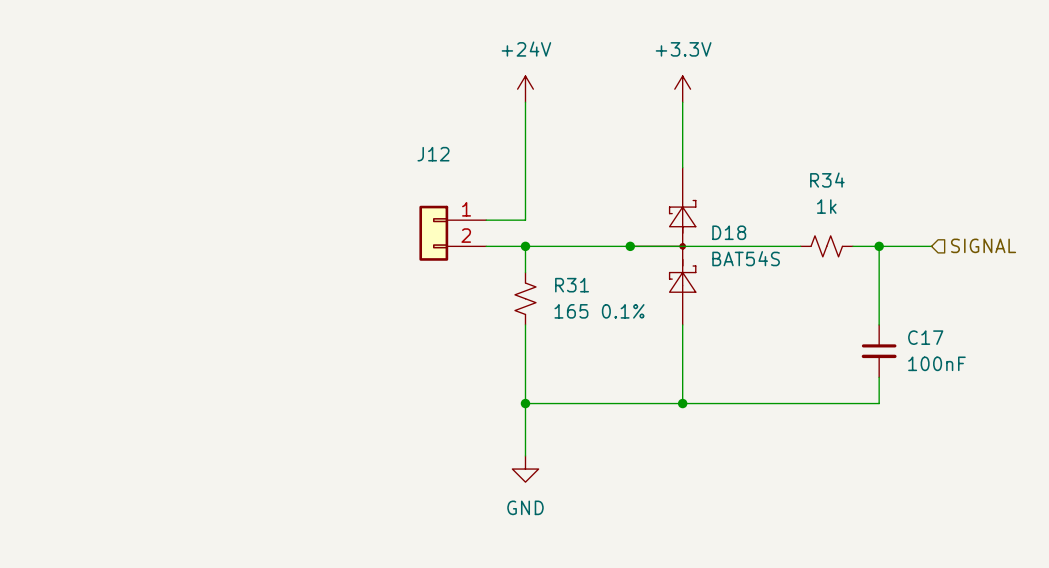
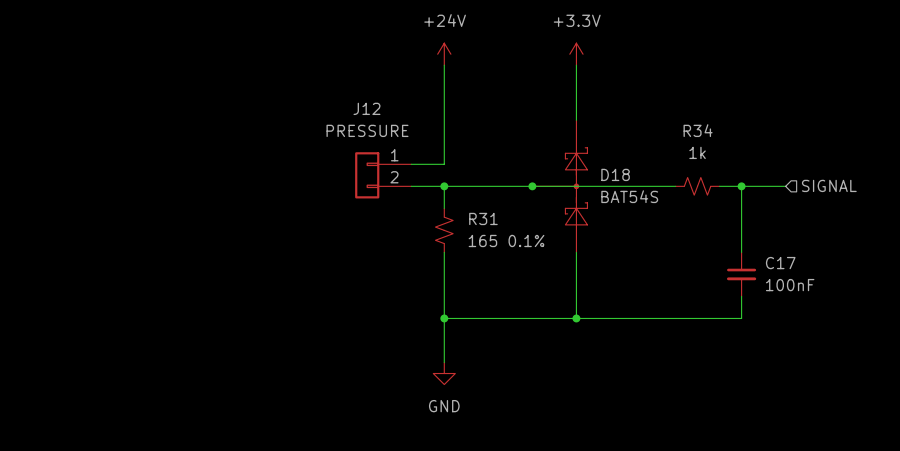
J12 value: none -> PRESSURE (367, 130)

